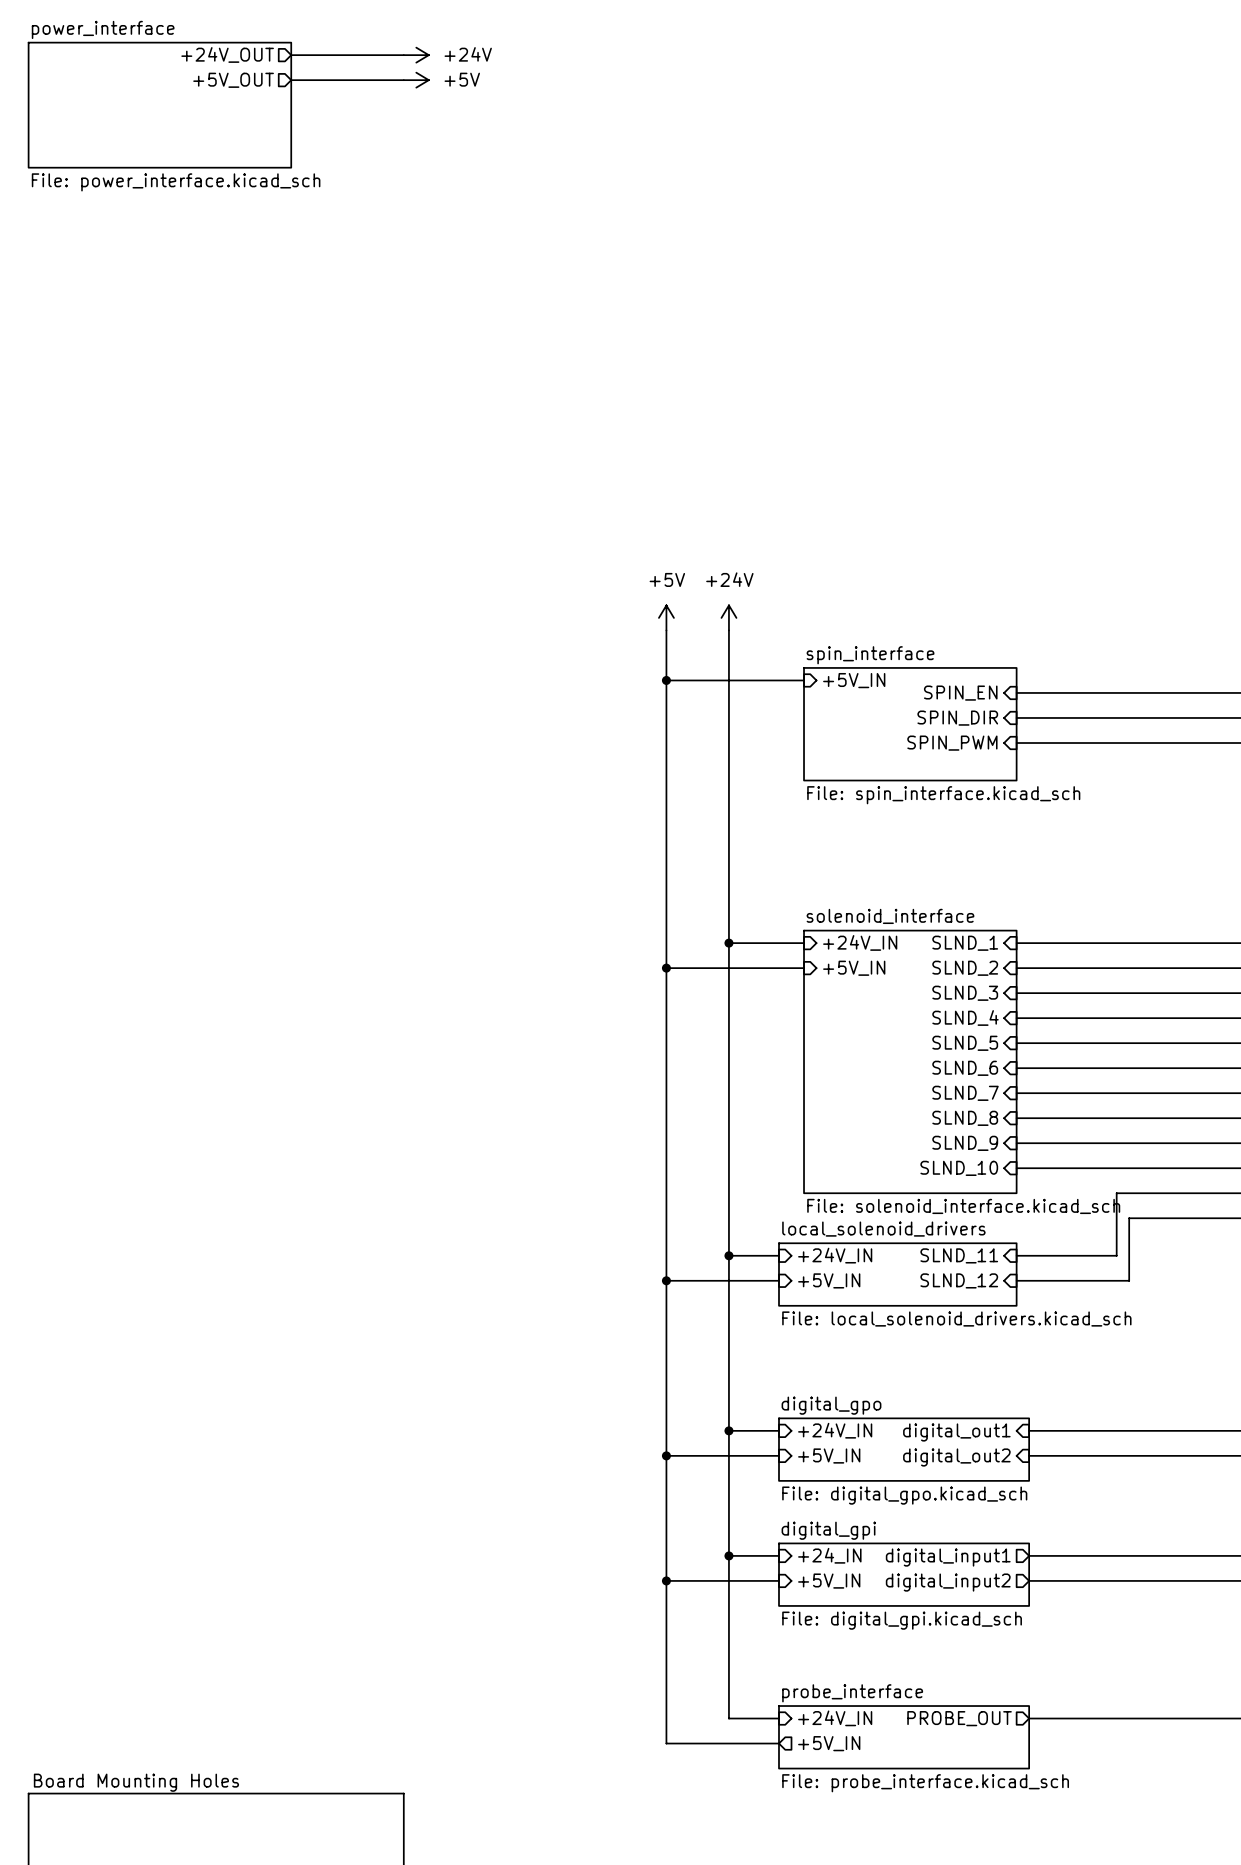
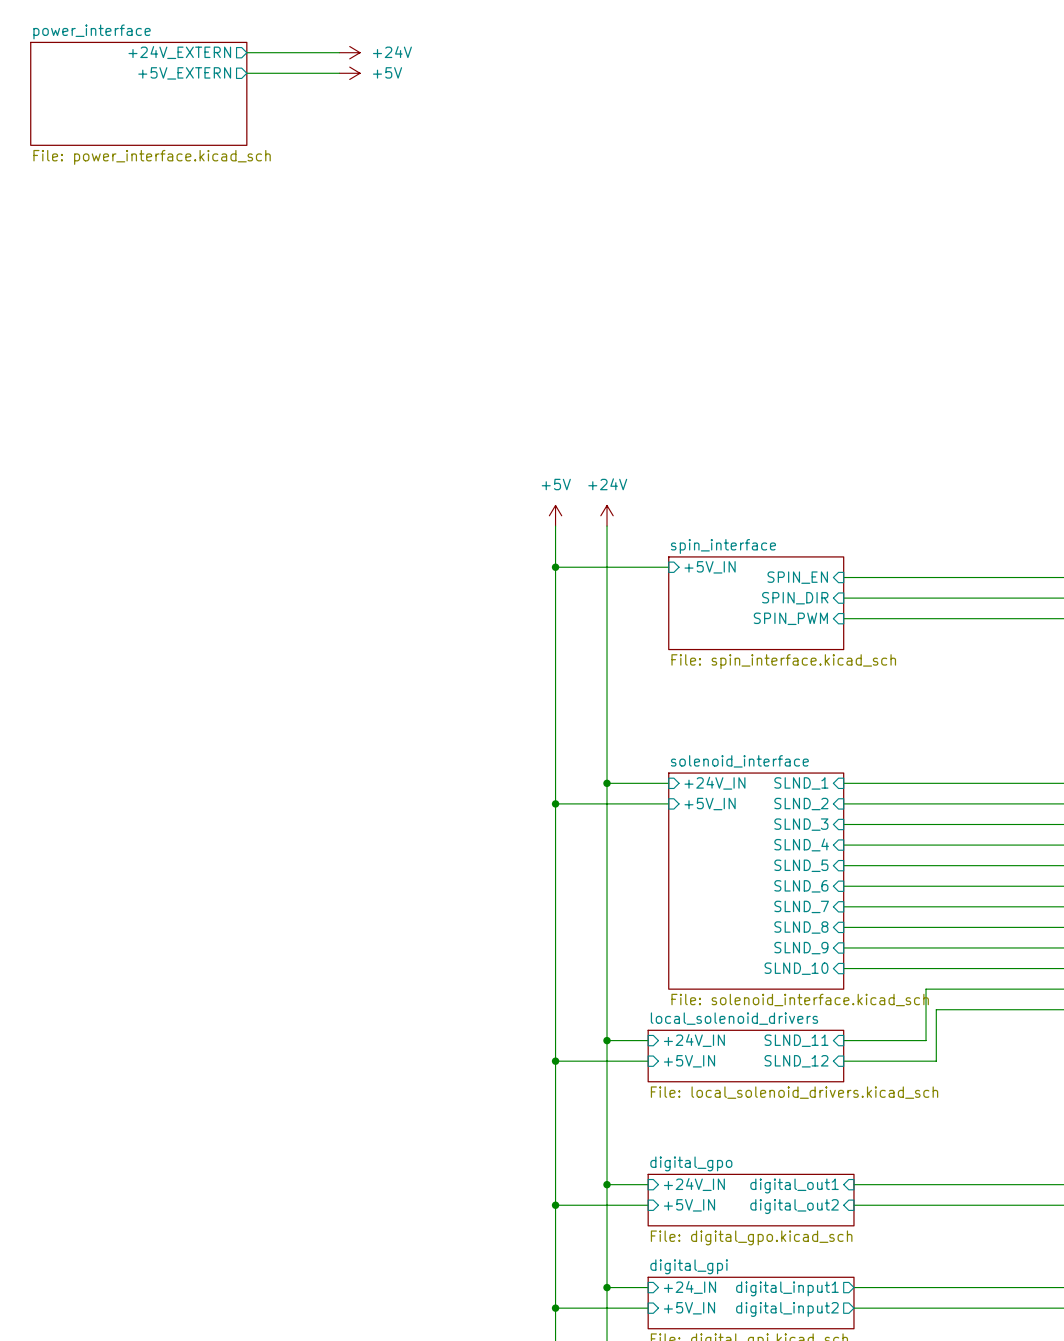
sheet pin: +24V_OUT (227, 54) -> +24V_EXTERN (179, 52)
sheet pin: +5V_OUT (233, 80) -> +5V_EXTERN (184, 73)

